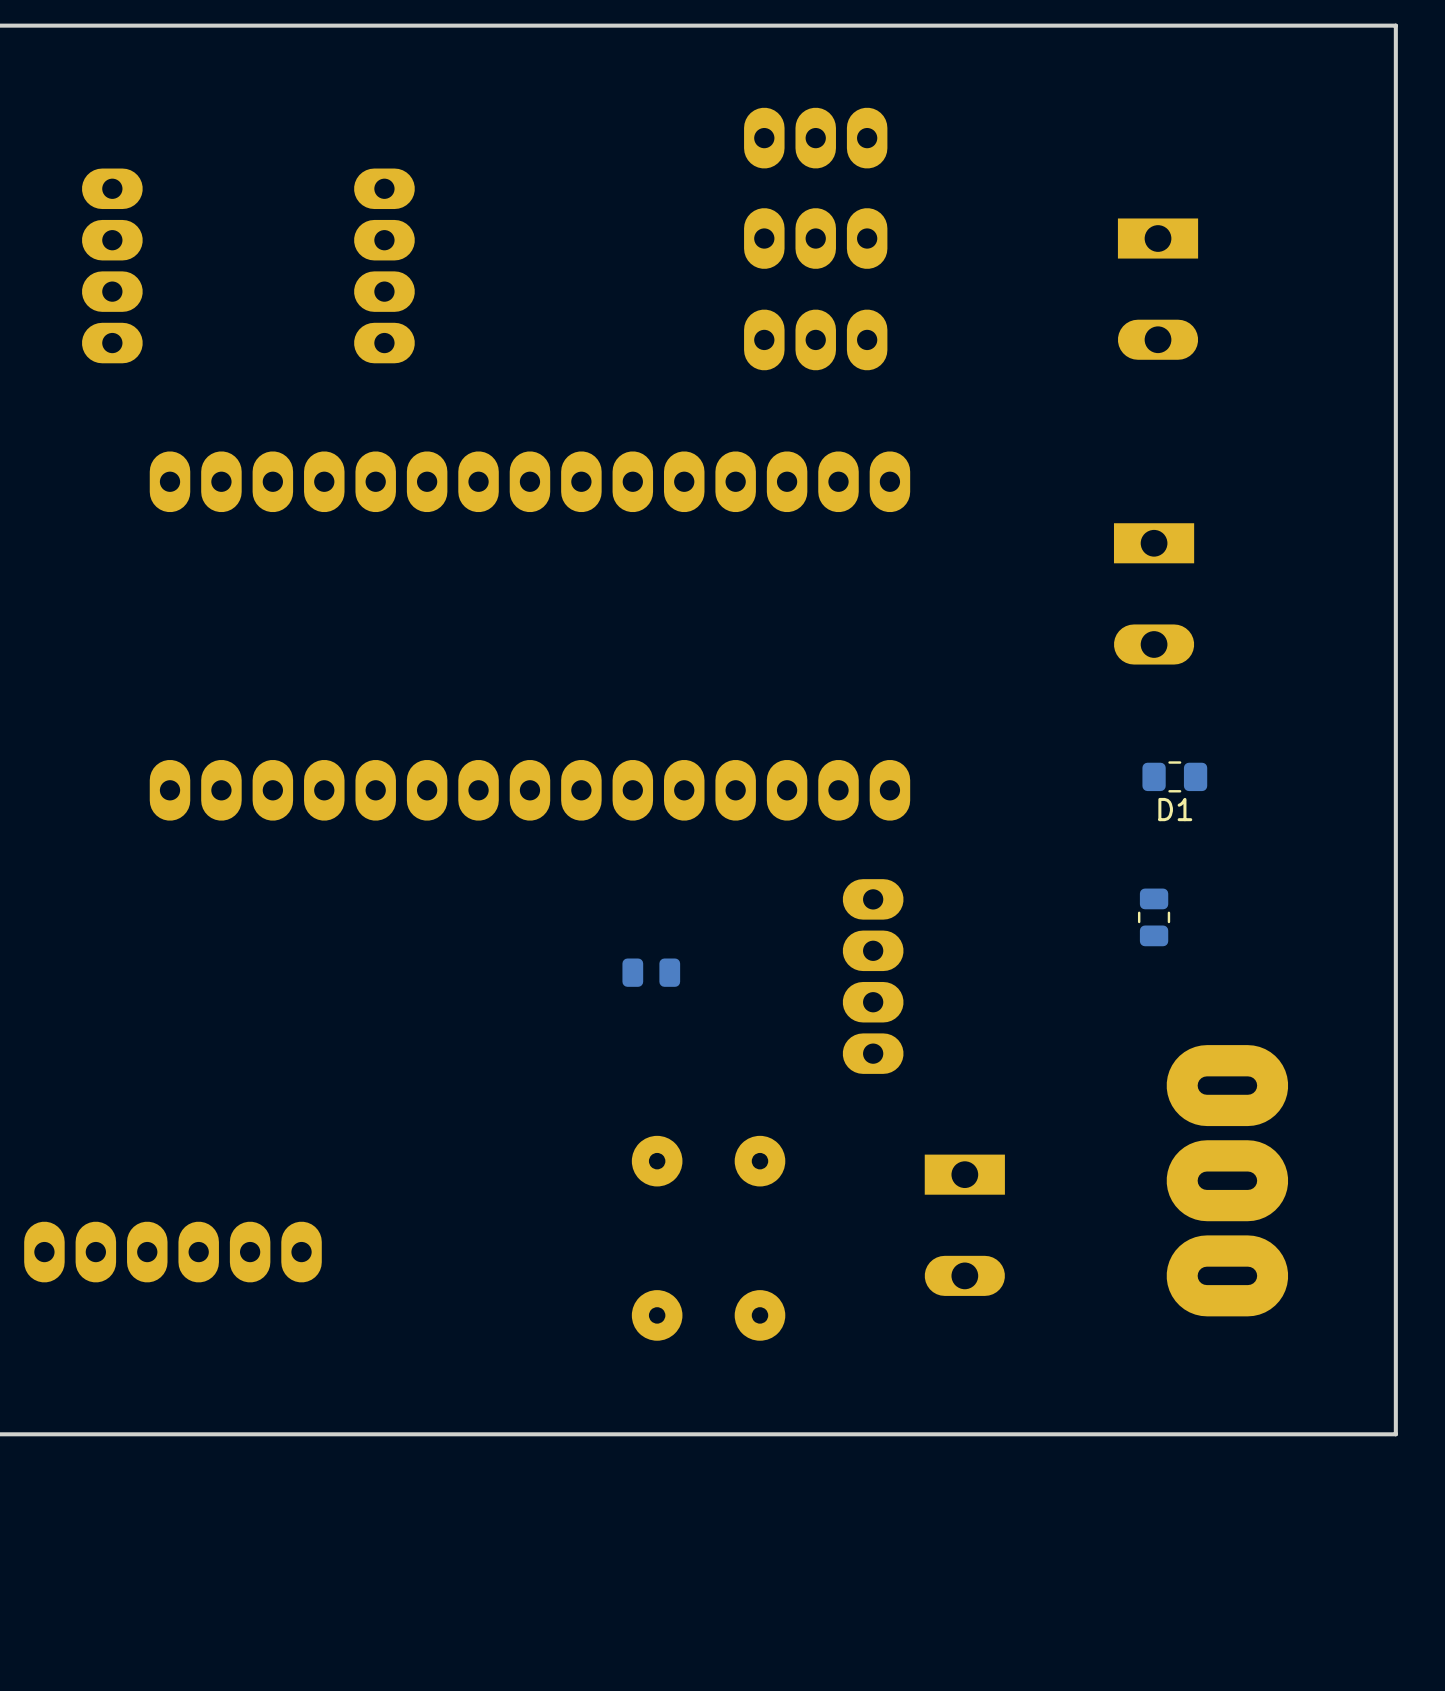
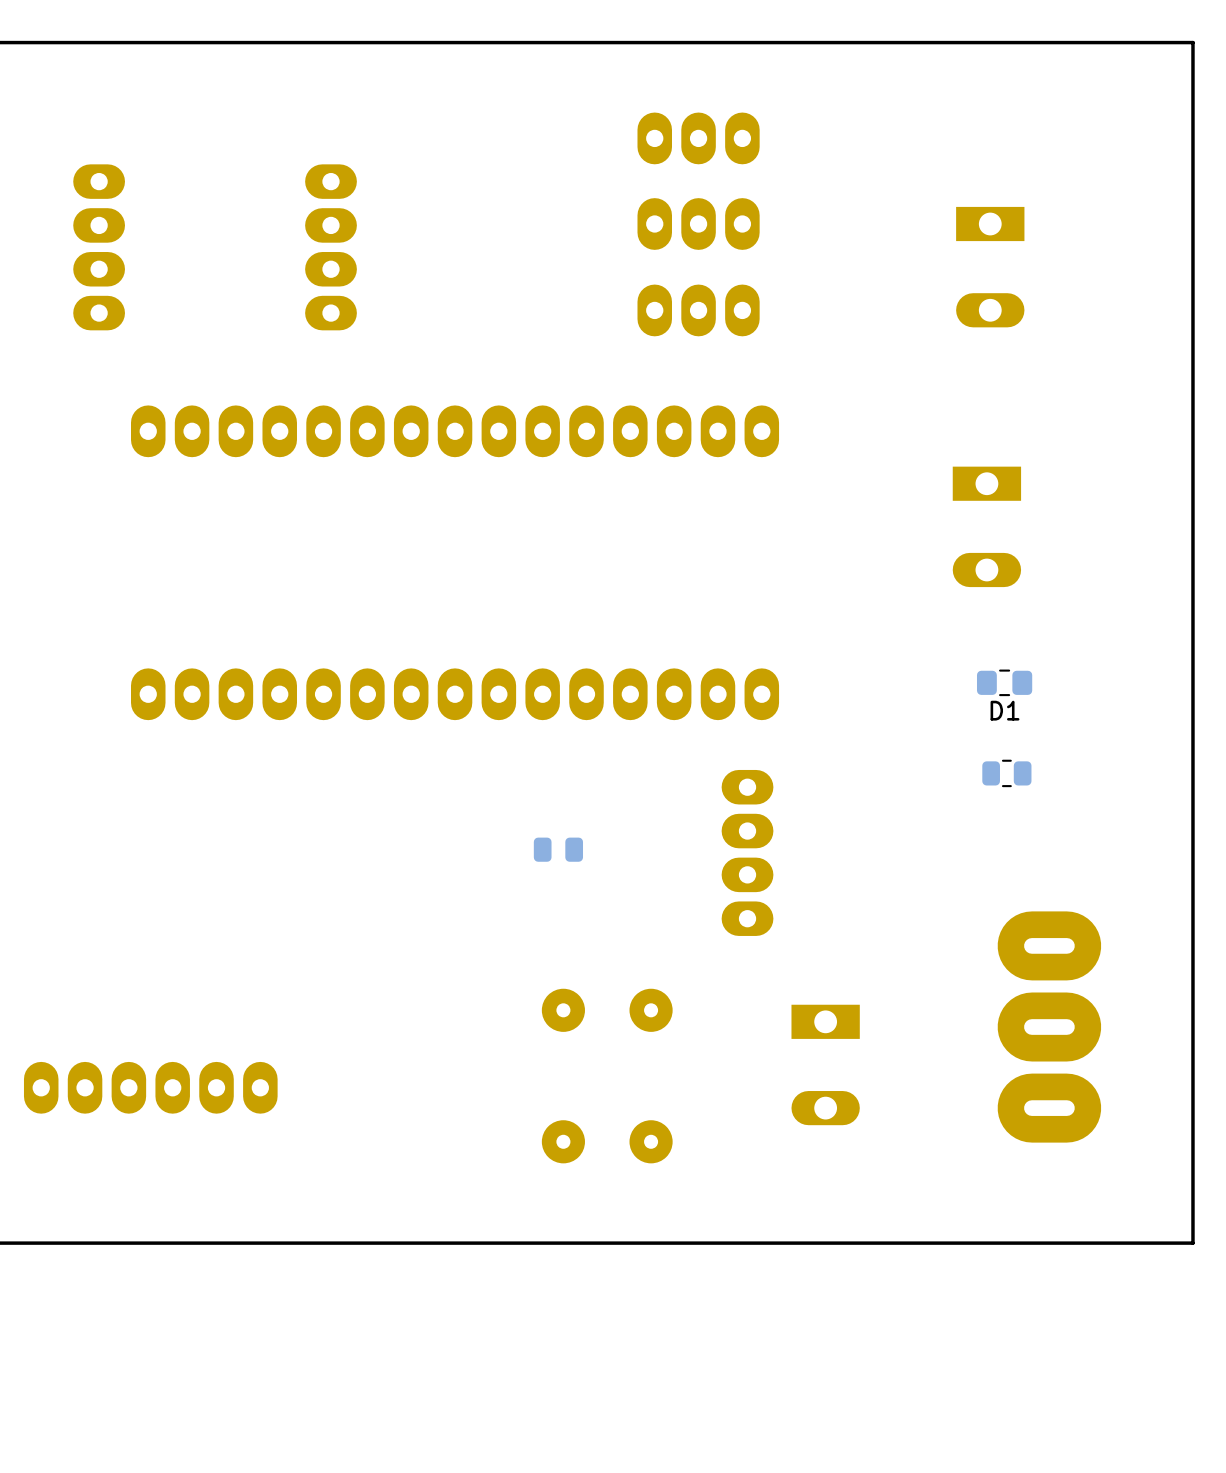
part rotation: 0° (1154, 917) -> 90° clockwise (1006, 773)
part position: (1154, 917) -> (1006, 773)

